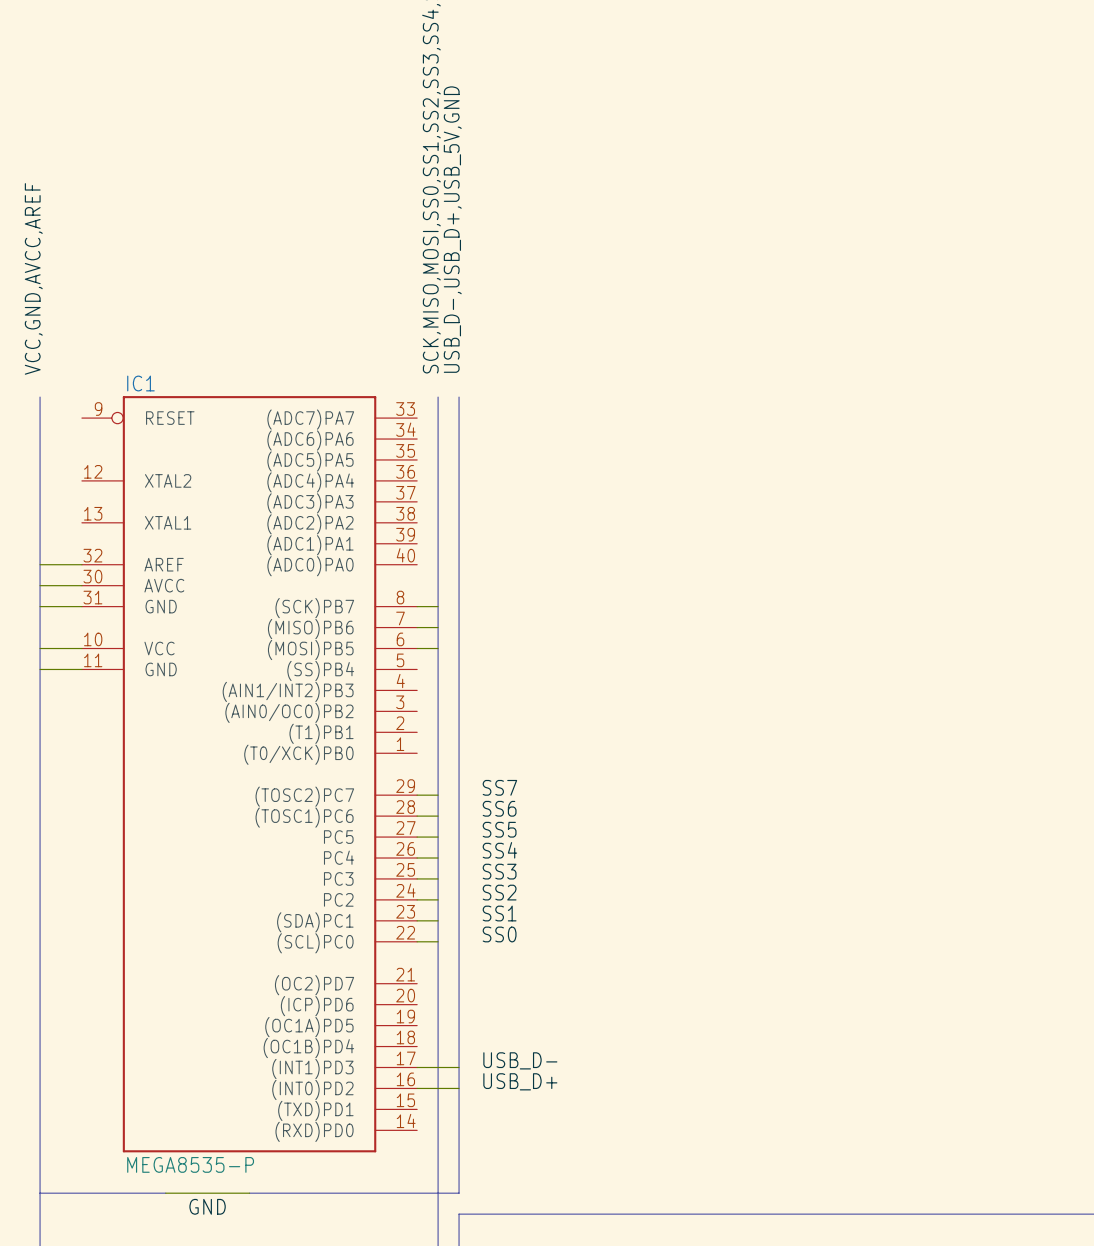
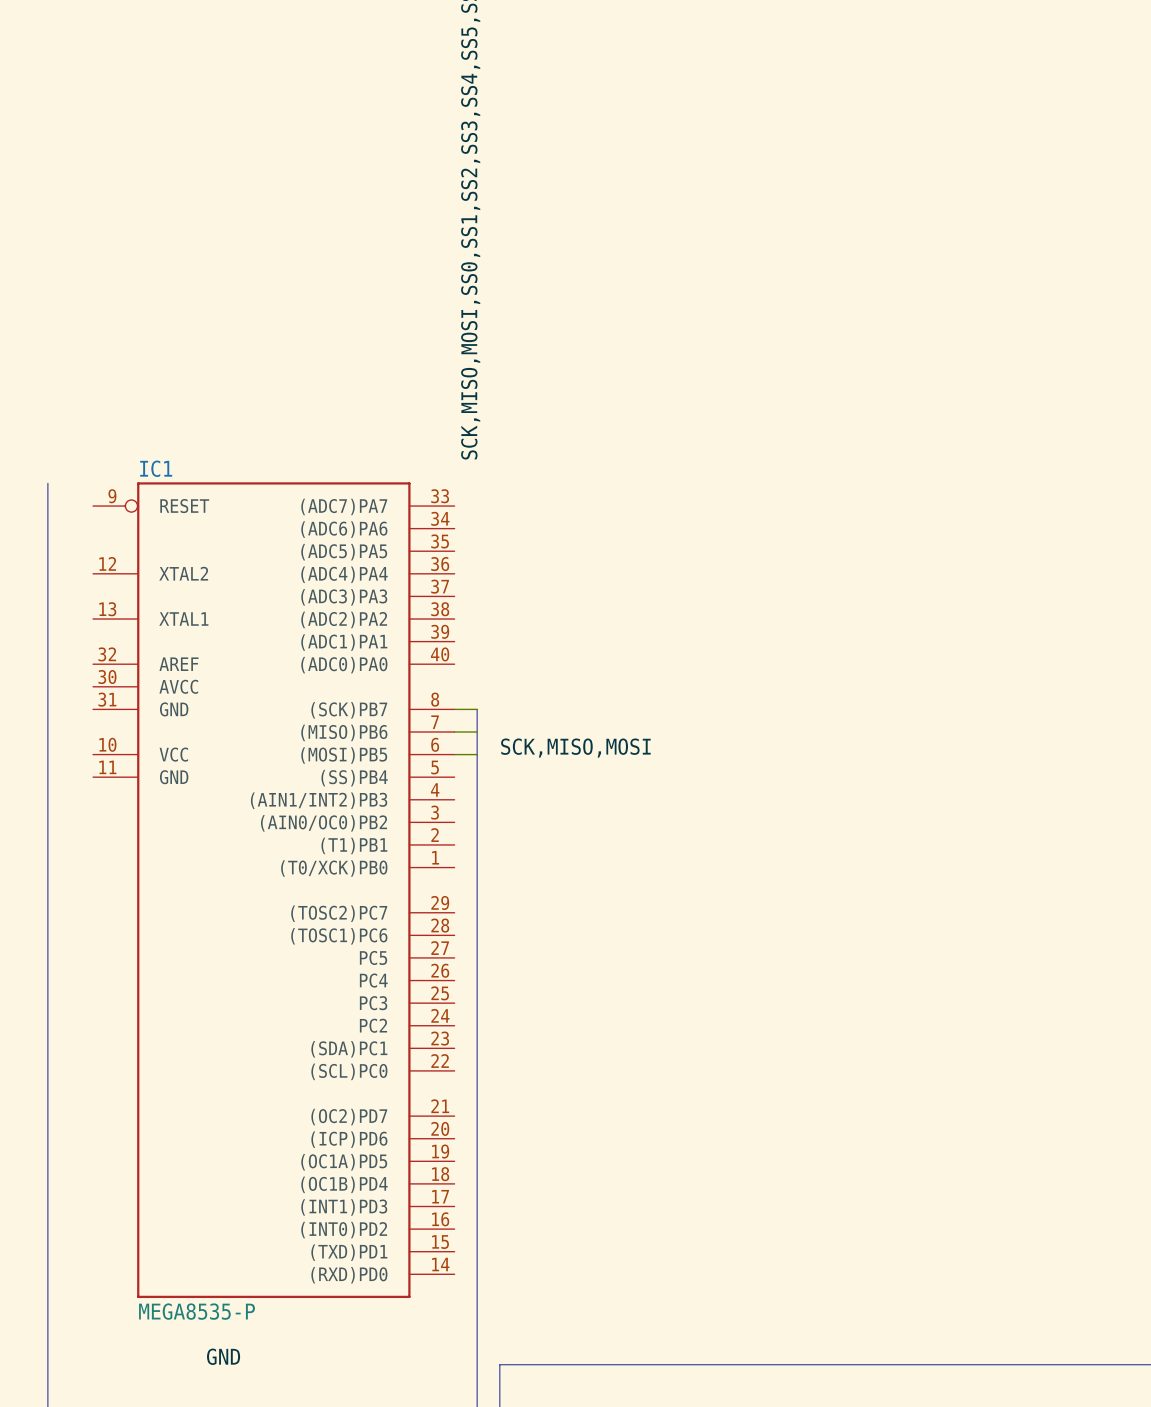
label: USB_D-,USB_D+,USB_5V,GND (452, 229) -> none
label: VCC,GND,AVCC,AREF (33, 278) -> none
bus: (438, 397) (438, 606) -> none
bus: (459, 397) (459, 1193) (249, 1193) -> none
wire: (40, 564) (81, 564) -> none
wire: (40, 585) (81, 585) -> none
wire: (40, 606) (81, 606) -> none
label: none -> SCK,MISO,MOSI (575, 748)
wire: (40, 648) (81, 648) -> none
wire: (40, 669) (81, 669) -> none
label: SS7 (499, 787) -> none
wire: (417, 795) (438, 795) -> none
label: SS6 (499, 808) -> none
wire: (417, 816) (438, 816) -> none
label: SS5 (499, 829) -> none
wire: (417, 837) (438, 837) -> none
label: SS4 (499, 850) -> none
wire: (417, 858) (438, 858) -> none
label: SS3 (499, 871) -> none
wire: (417, 878) (438, 878) -> none
label: SS2 (499, 892) -> none
wire: (417, 899) (438, 899) -> none
label: SS1 (499, 913) -> none
wire: (417, 920) (438, 920) -> none
label: SS0 (499, 934) -> none
wire: (417, 941) (438, 941) -> none
label: USB_D- (520, 1060) -> none
wire: (417, 1067) (459, 1067) -> none
label: USB_D+ (520, 1081) -> none
wire: (417, 1088) (459, 1088) -> none
bus: (40, 1193) (165, 1193) -> none
wire: (165, 1193) (249, 1193) -> none

